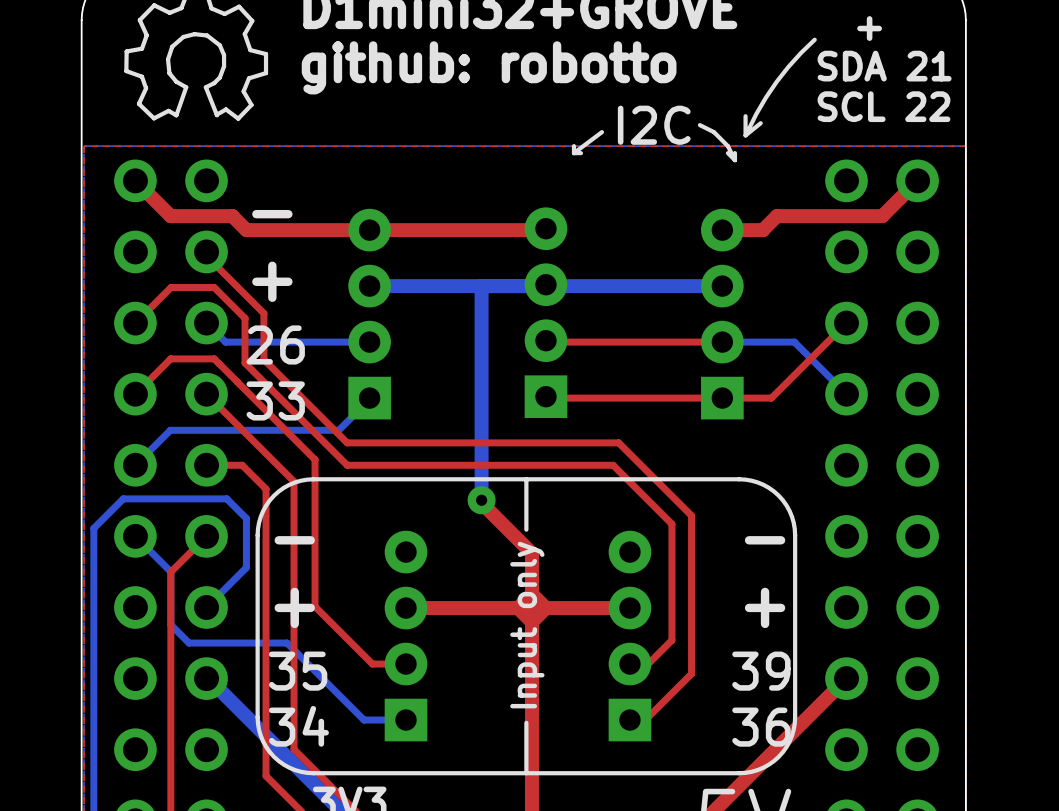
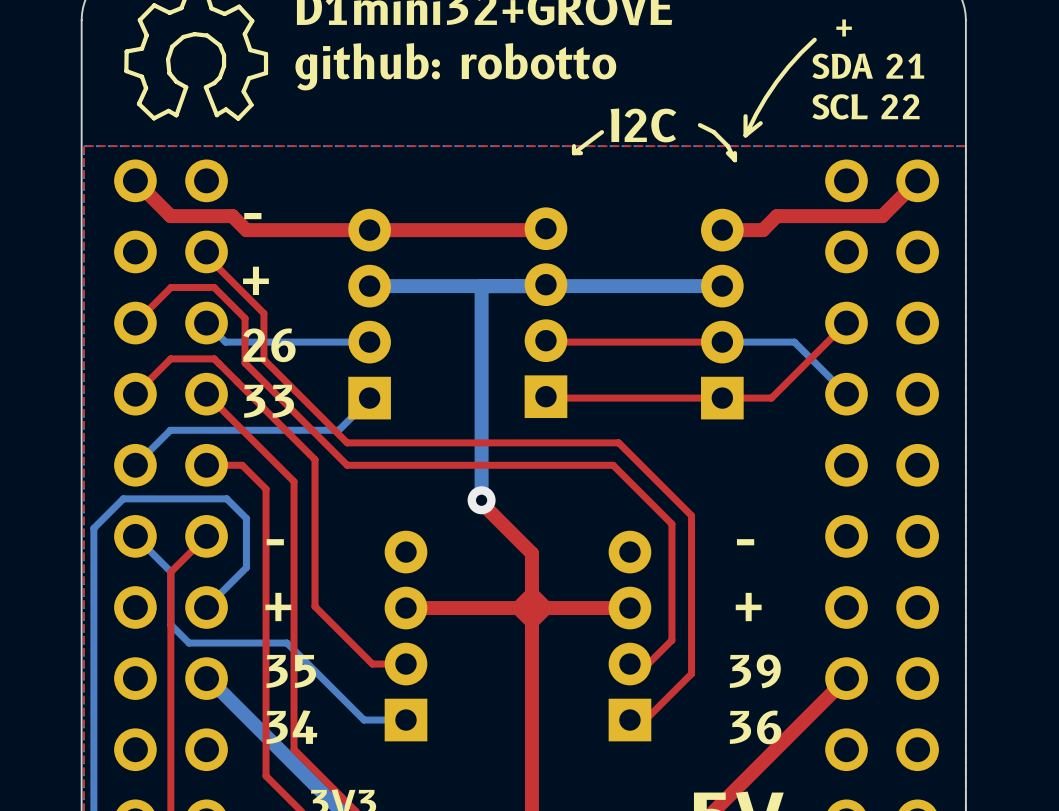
line: (313, 479) (739, 479) (757, 482) (768, 487) (786, 505) (794, 528) (795, 717) (793, 729) (786, 747) (768, 764) (757, 770) (739, 773) (313, 773) (295, 770) (283, 764) (266, 747) (257, 723) (257, 528) (263, 510) (278, 491) (295, 482) (313, 479) -> none
line: (526, 479) (526, 529) -> none
text: Input only (527, 625) -> none
line: (526, 722) (526, 773) -> none

